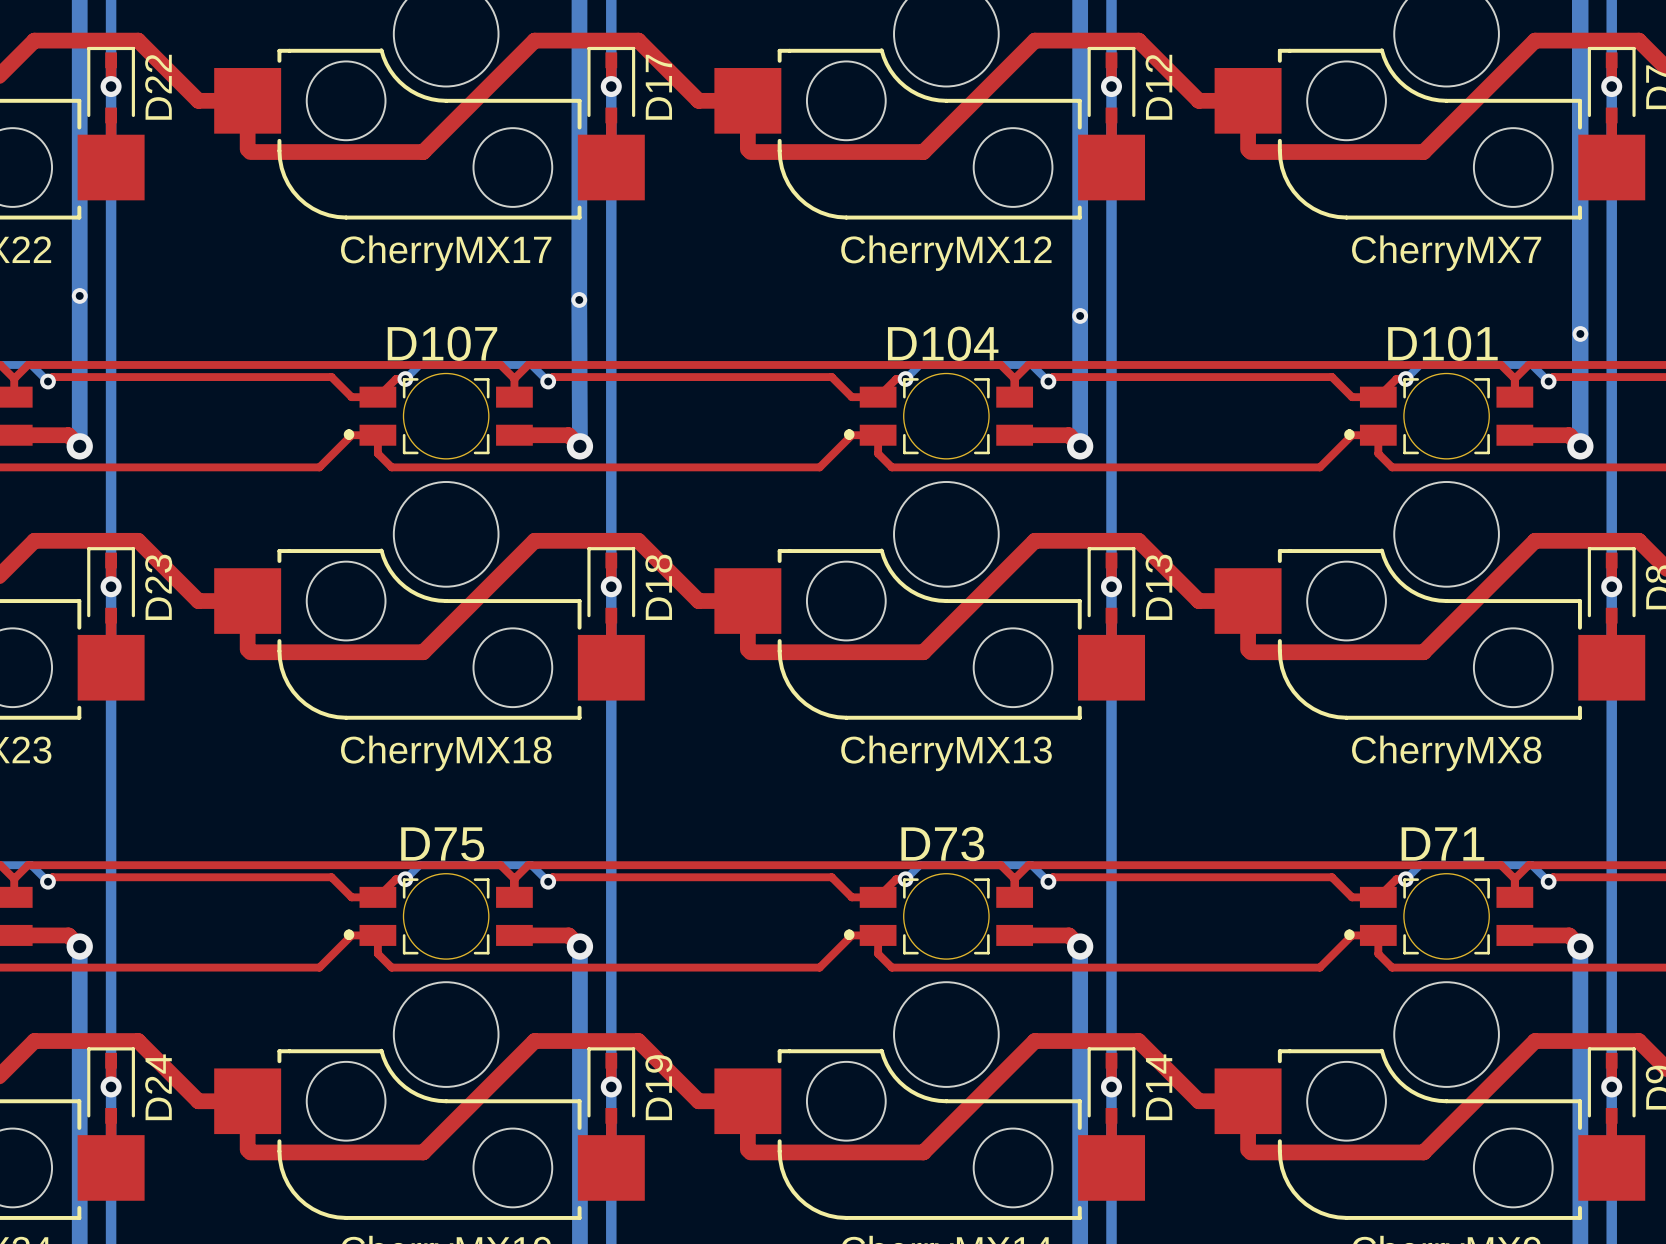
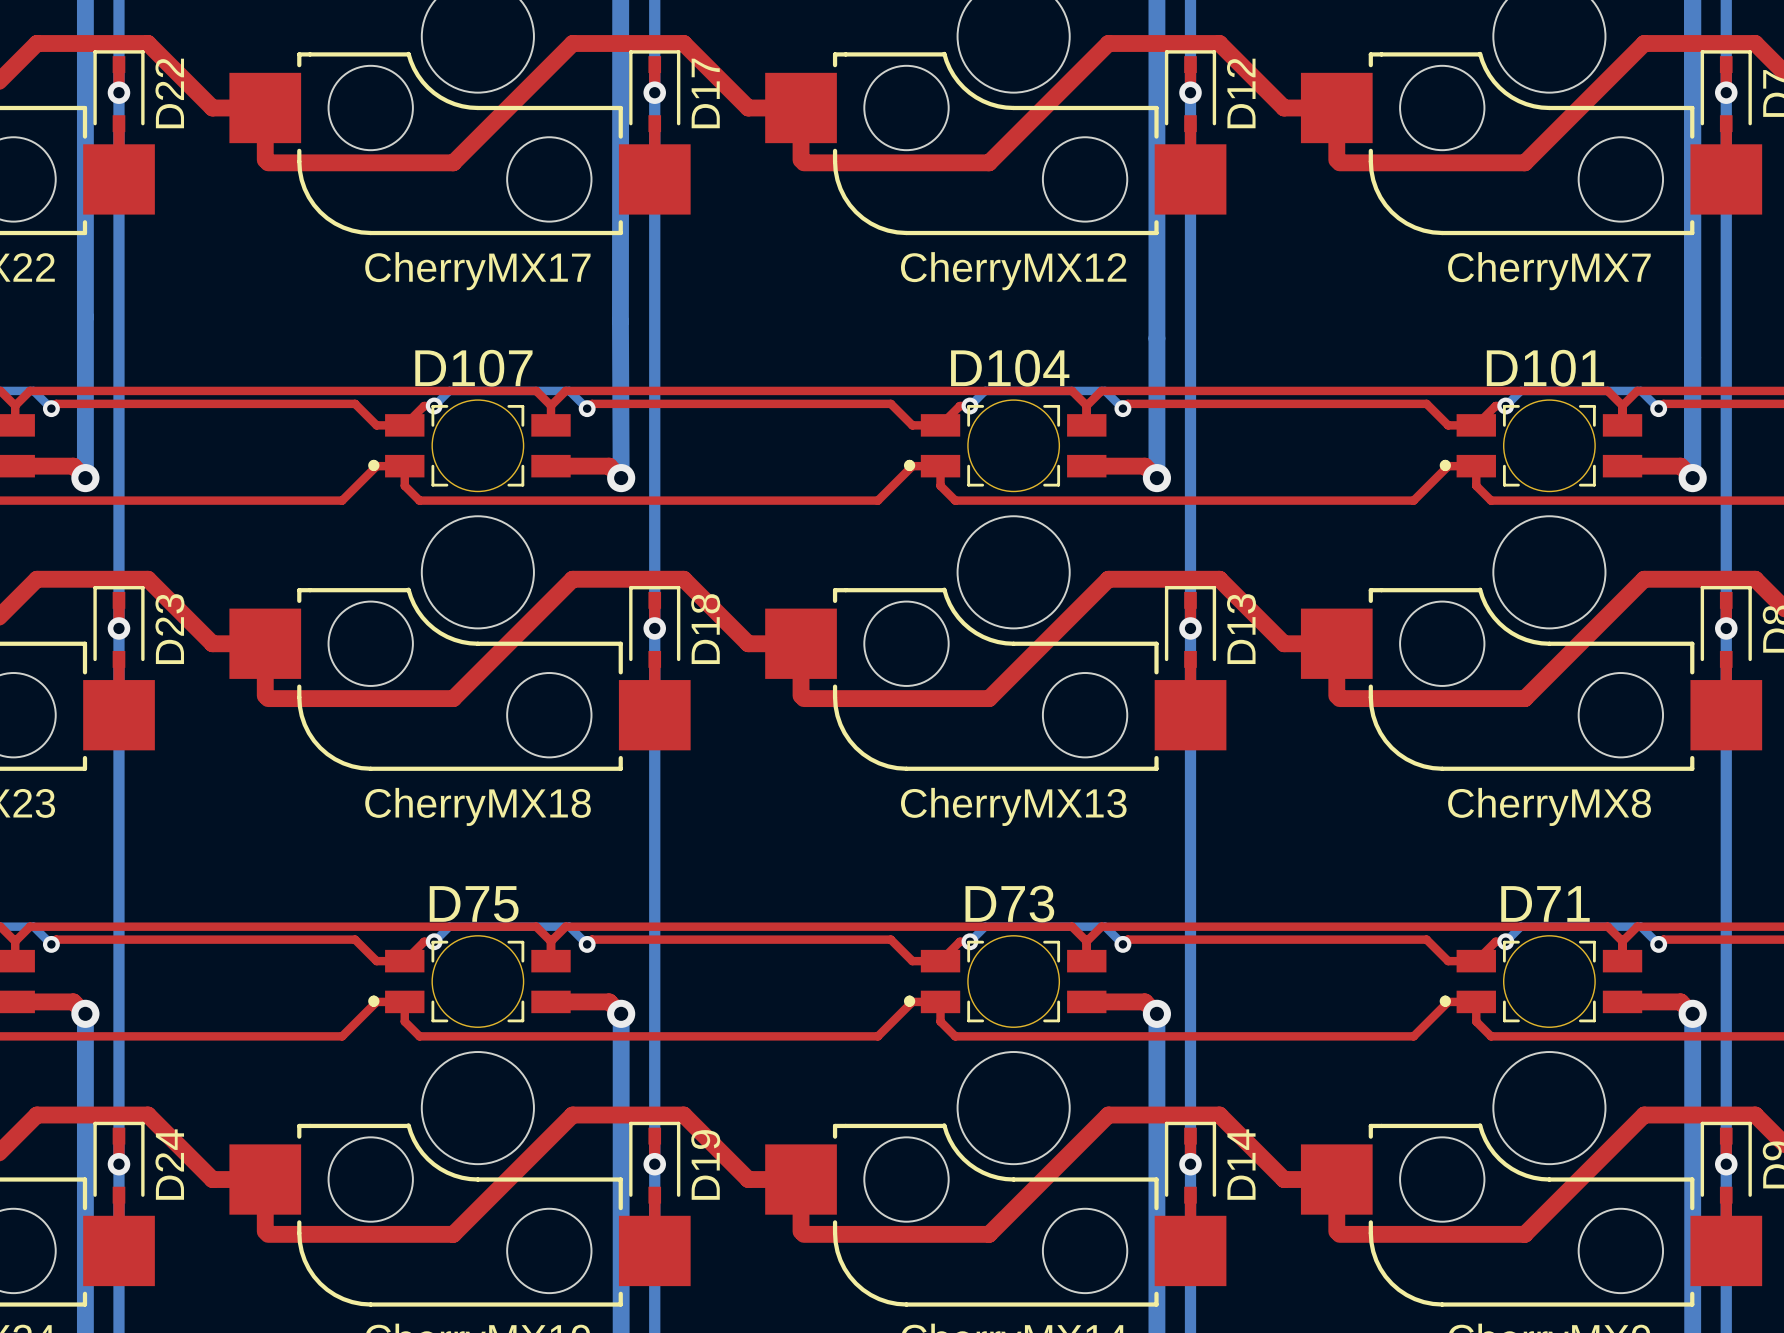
via: (79, 295) -> none
via: (579, 299) -> none
via: (1080, 315) -> none
via: (1580, 333) -> none

